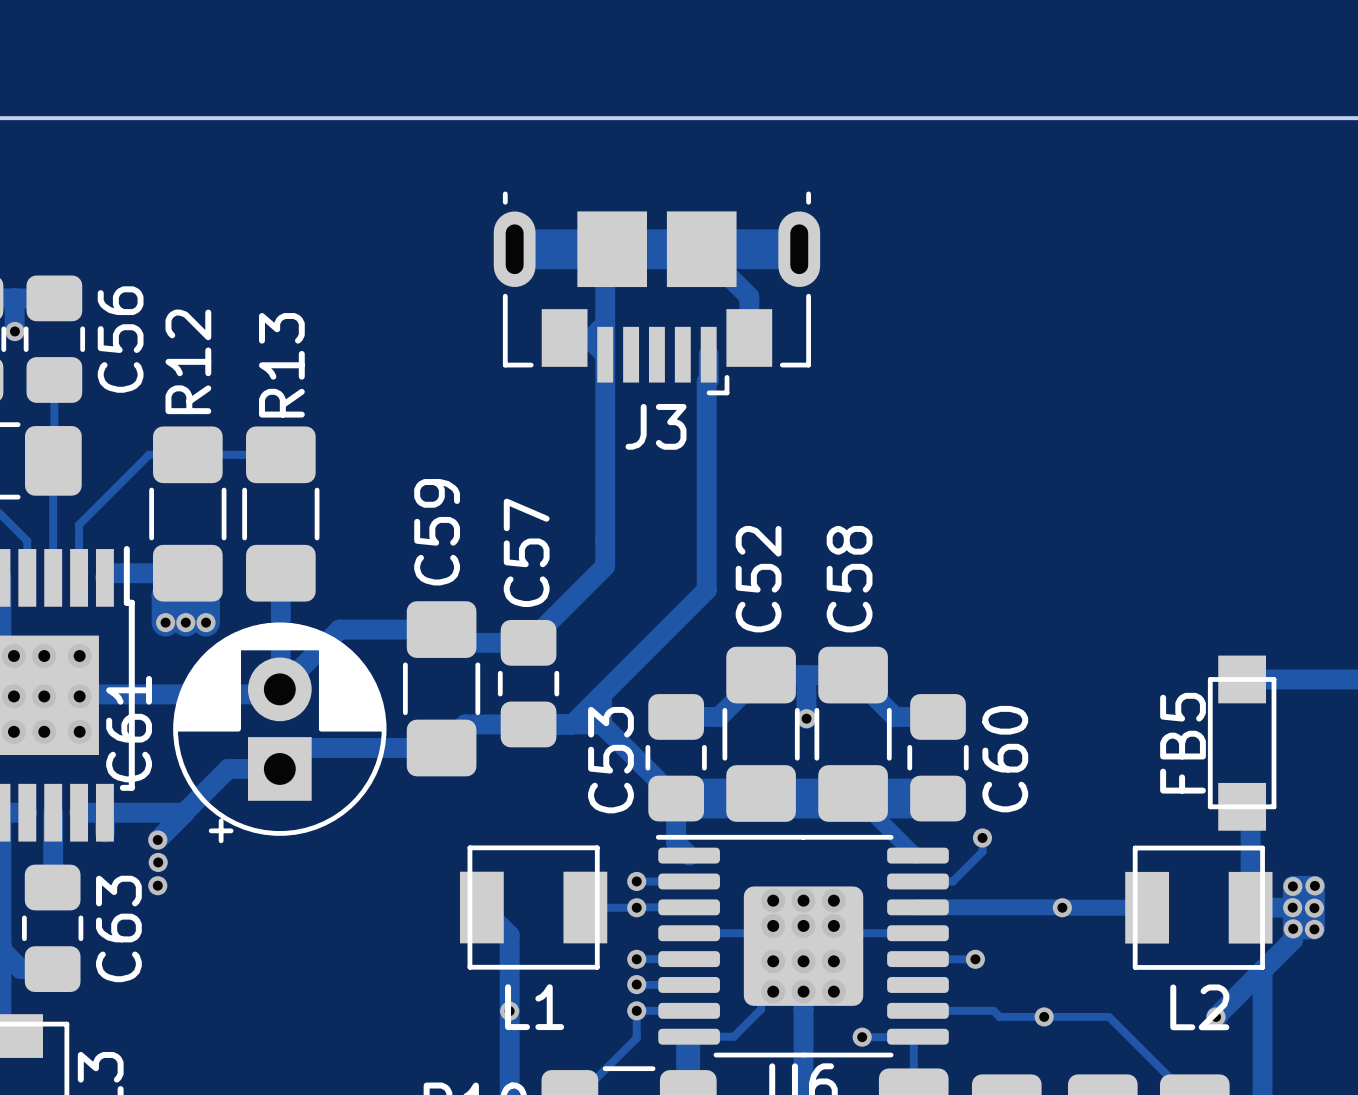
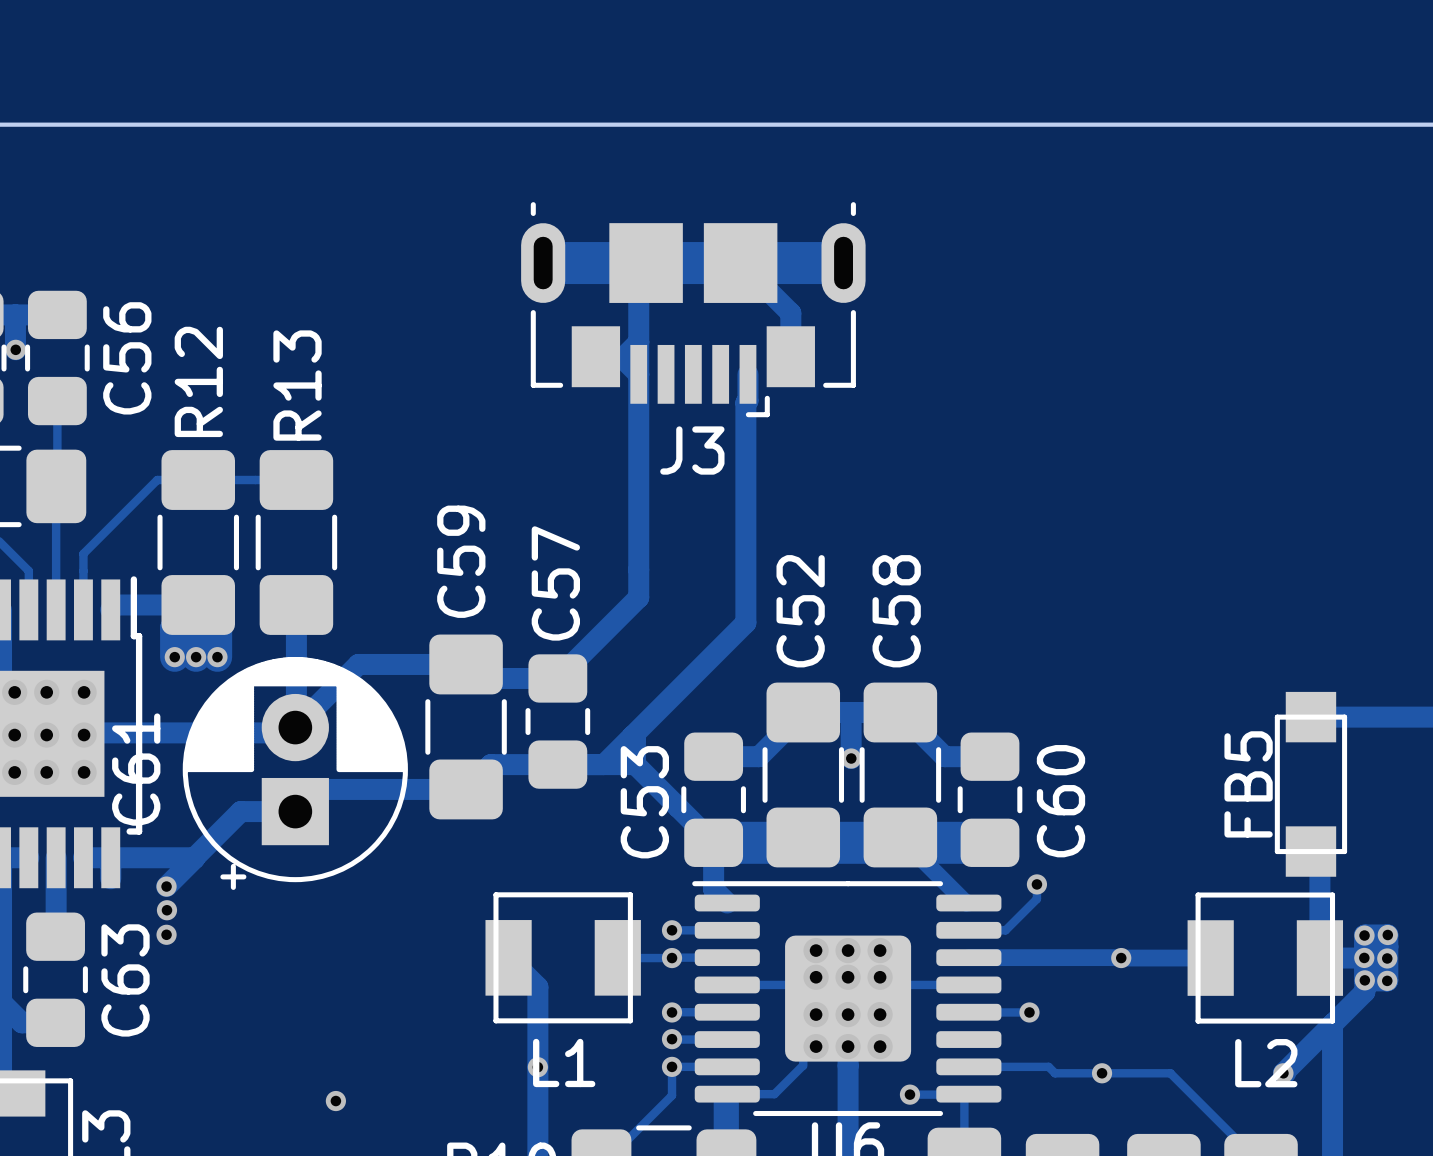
via: none -> (335, 1101)

